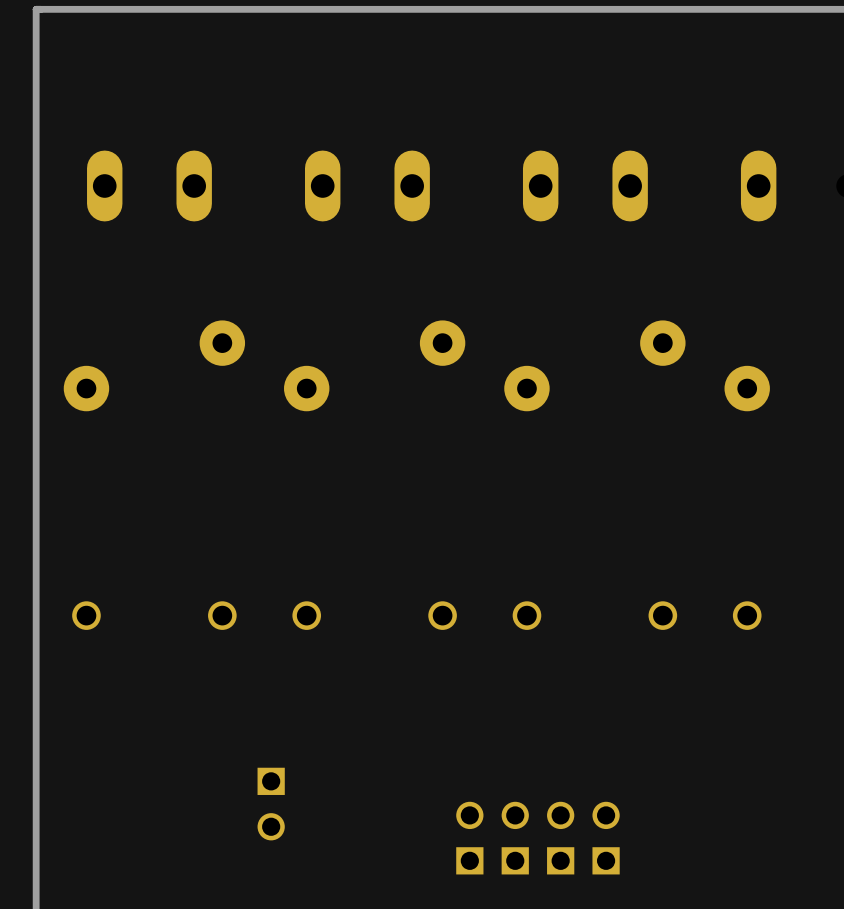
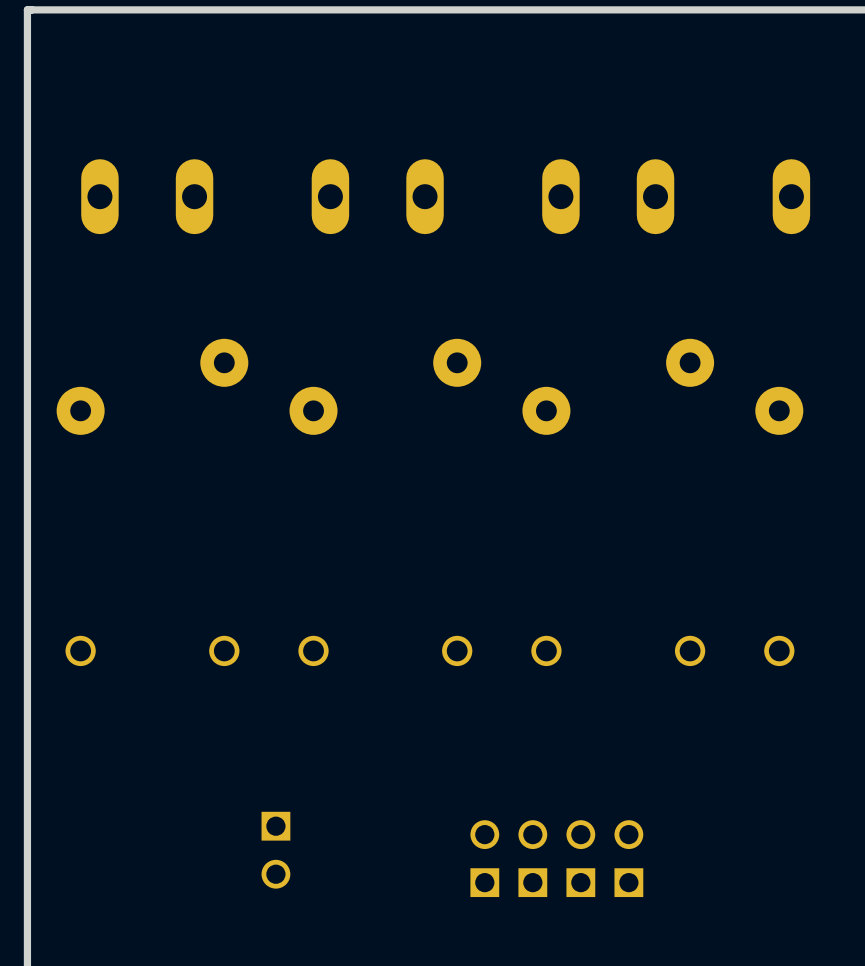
part: none -> (484, 858)
part: none -> (532, 858)
part: none -> (580, 858)
part: none -> (628, 858)
part: (469, 838) -> none
part: (515, 838) -> none
part: (560, 838) -> none
part: (606, 838) -> none

